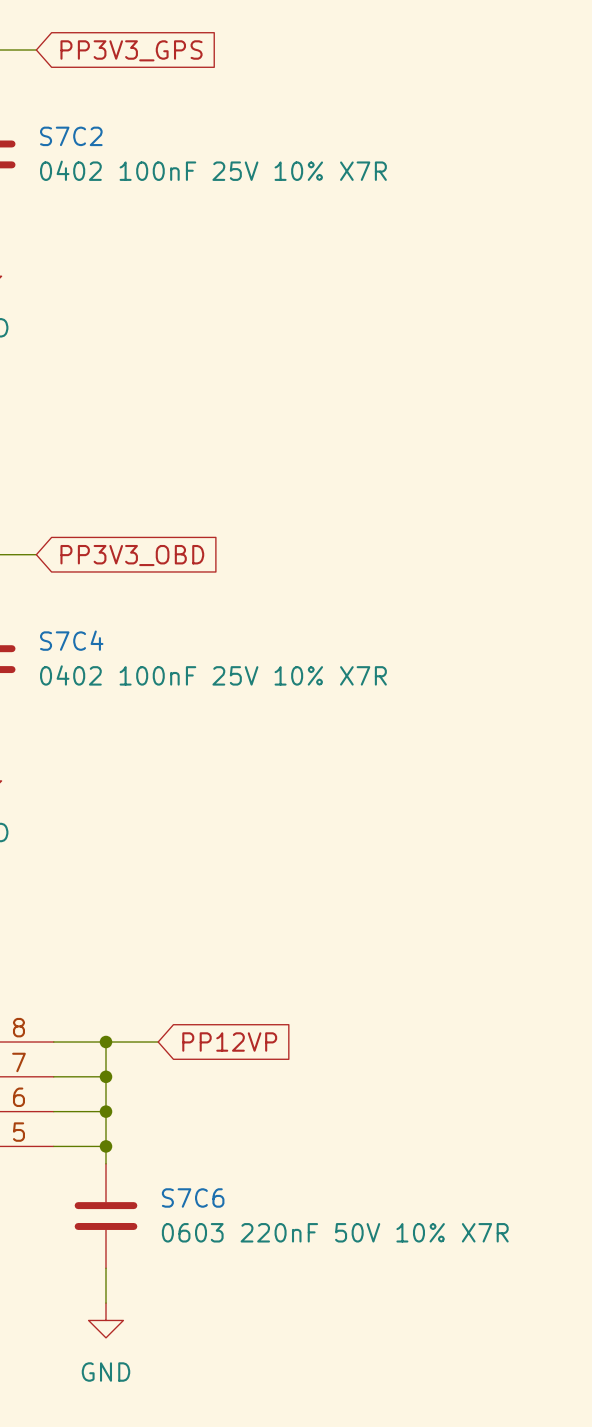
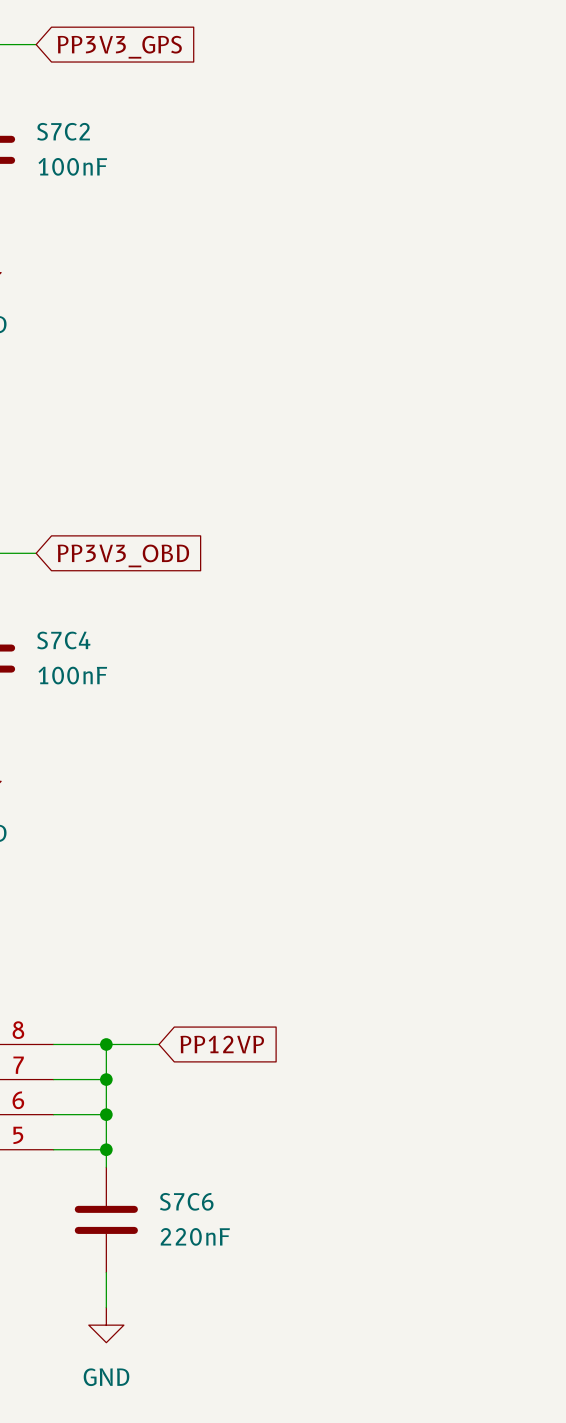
S7C2 value: 0402 100nF 25V 10% X7R (213, 170) -> 100nF (72, 166)
S7C4 value: 0402 100nF 25V 10% X7R (213, 675) -> 100nF (72, 675)
S7C6 value: 0603 220nF 50V 10% X7R (335, 1232) -> 220nF (195, 1236)

